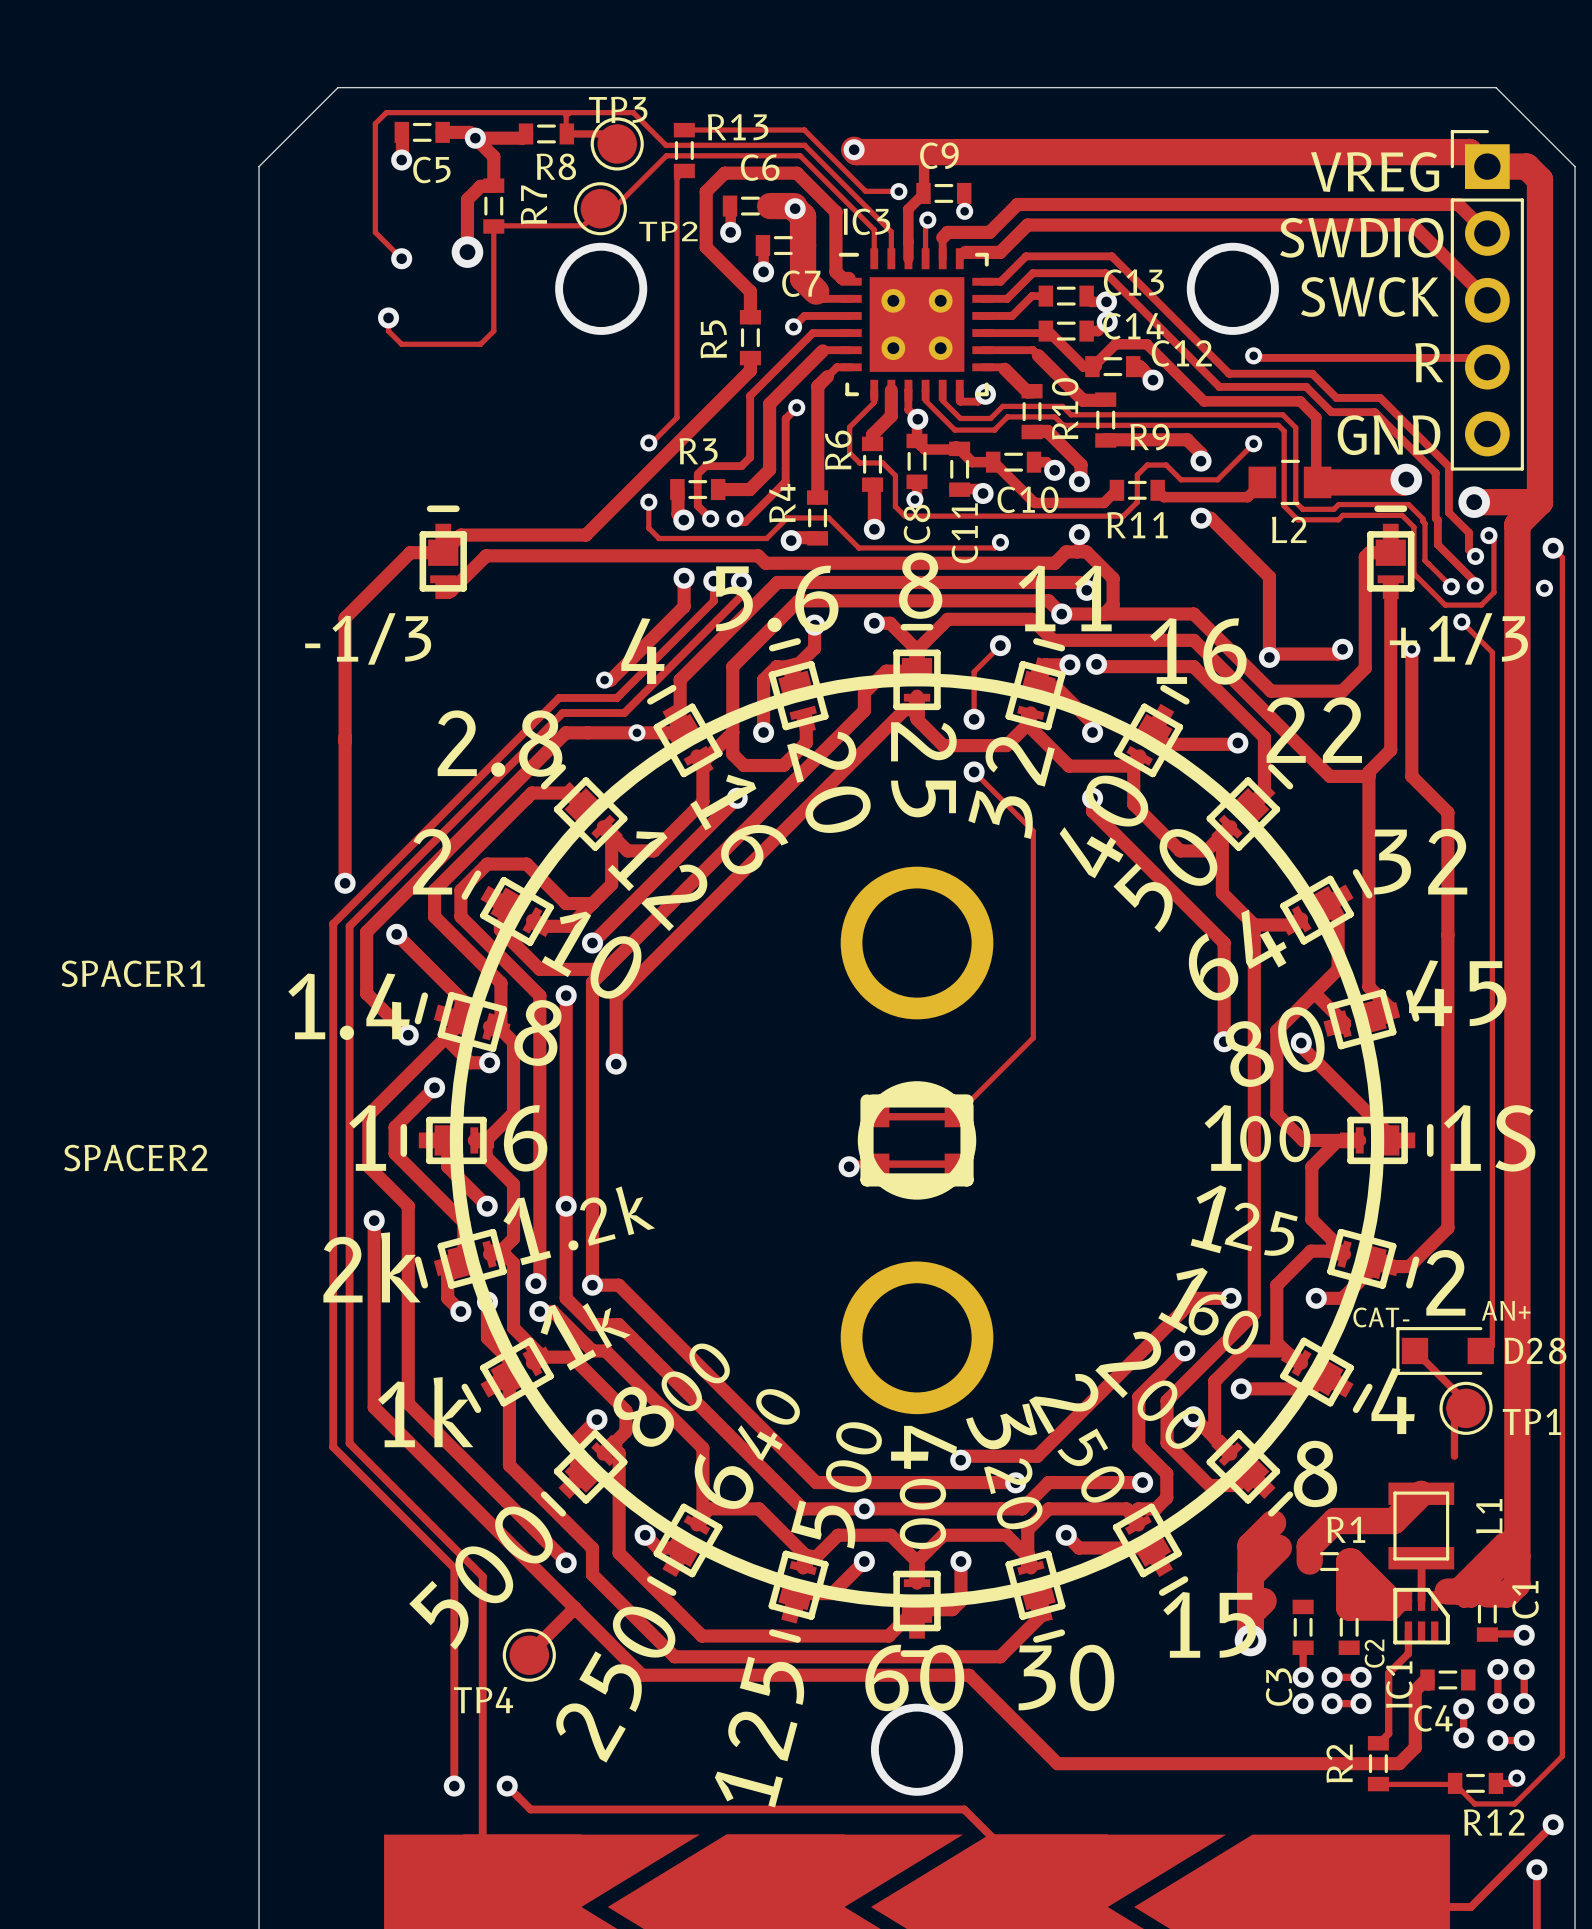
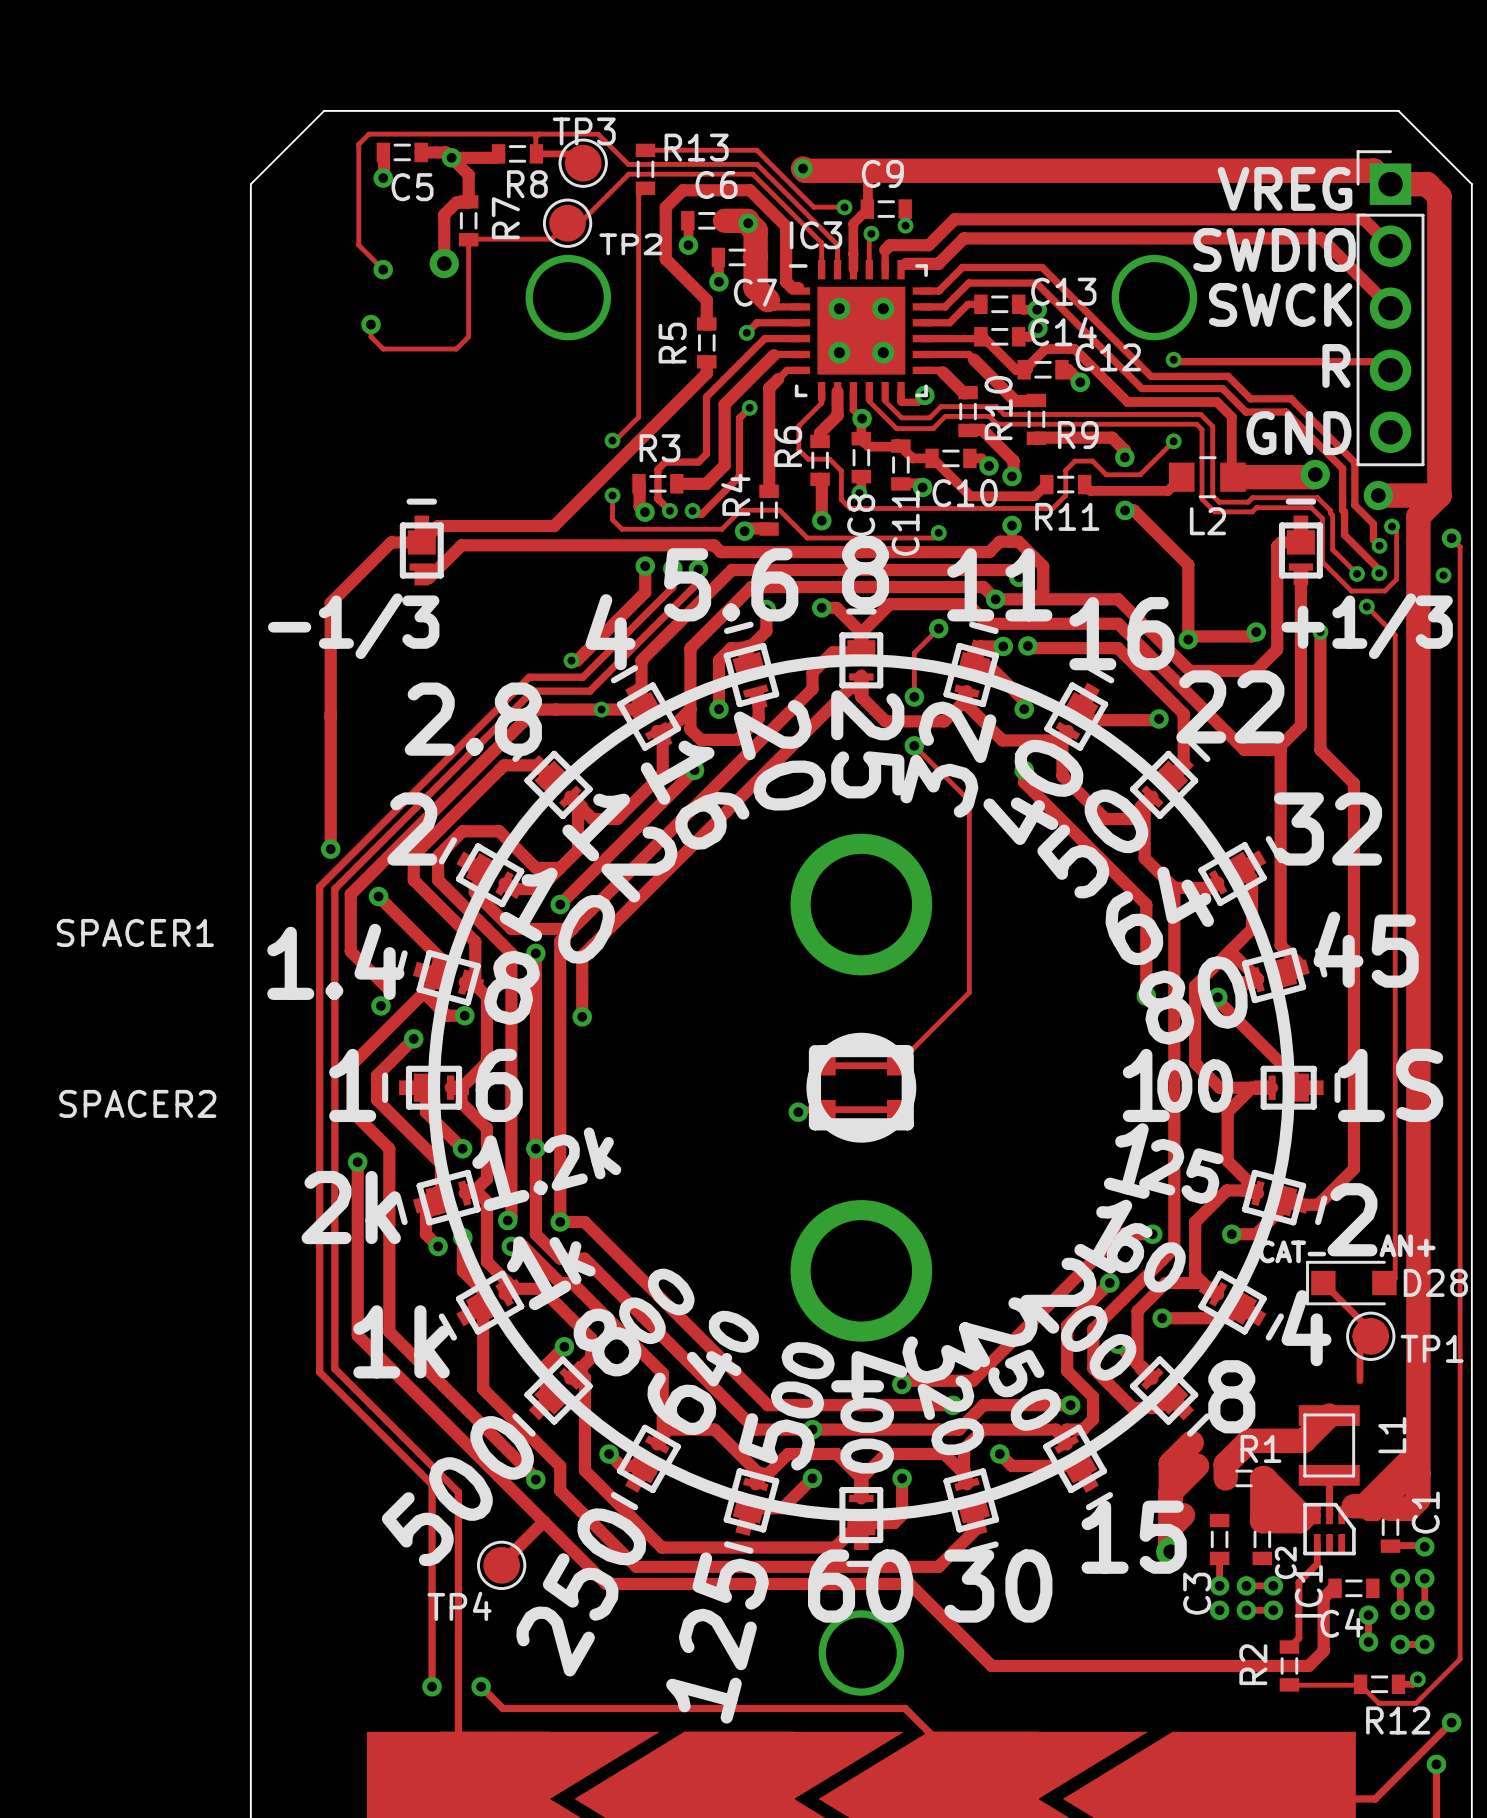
via position: (408, 1035) -> (381, 1005)

